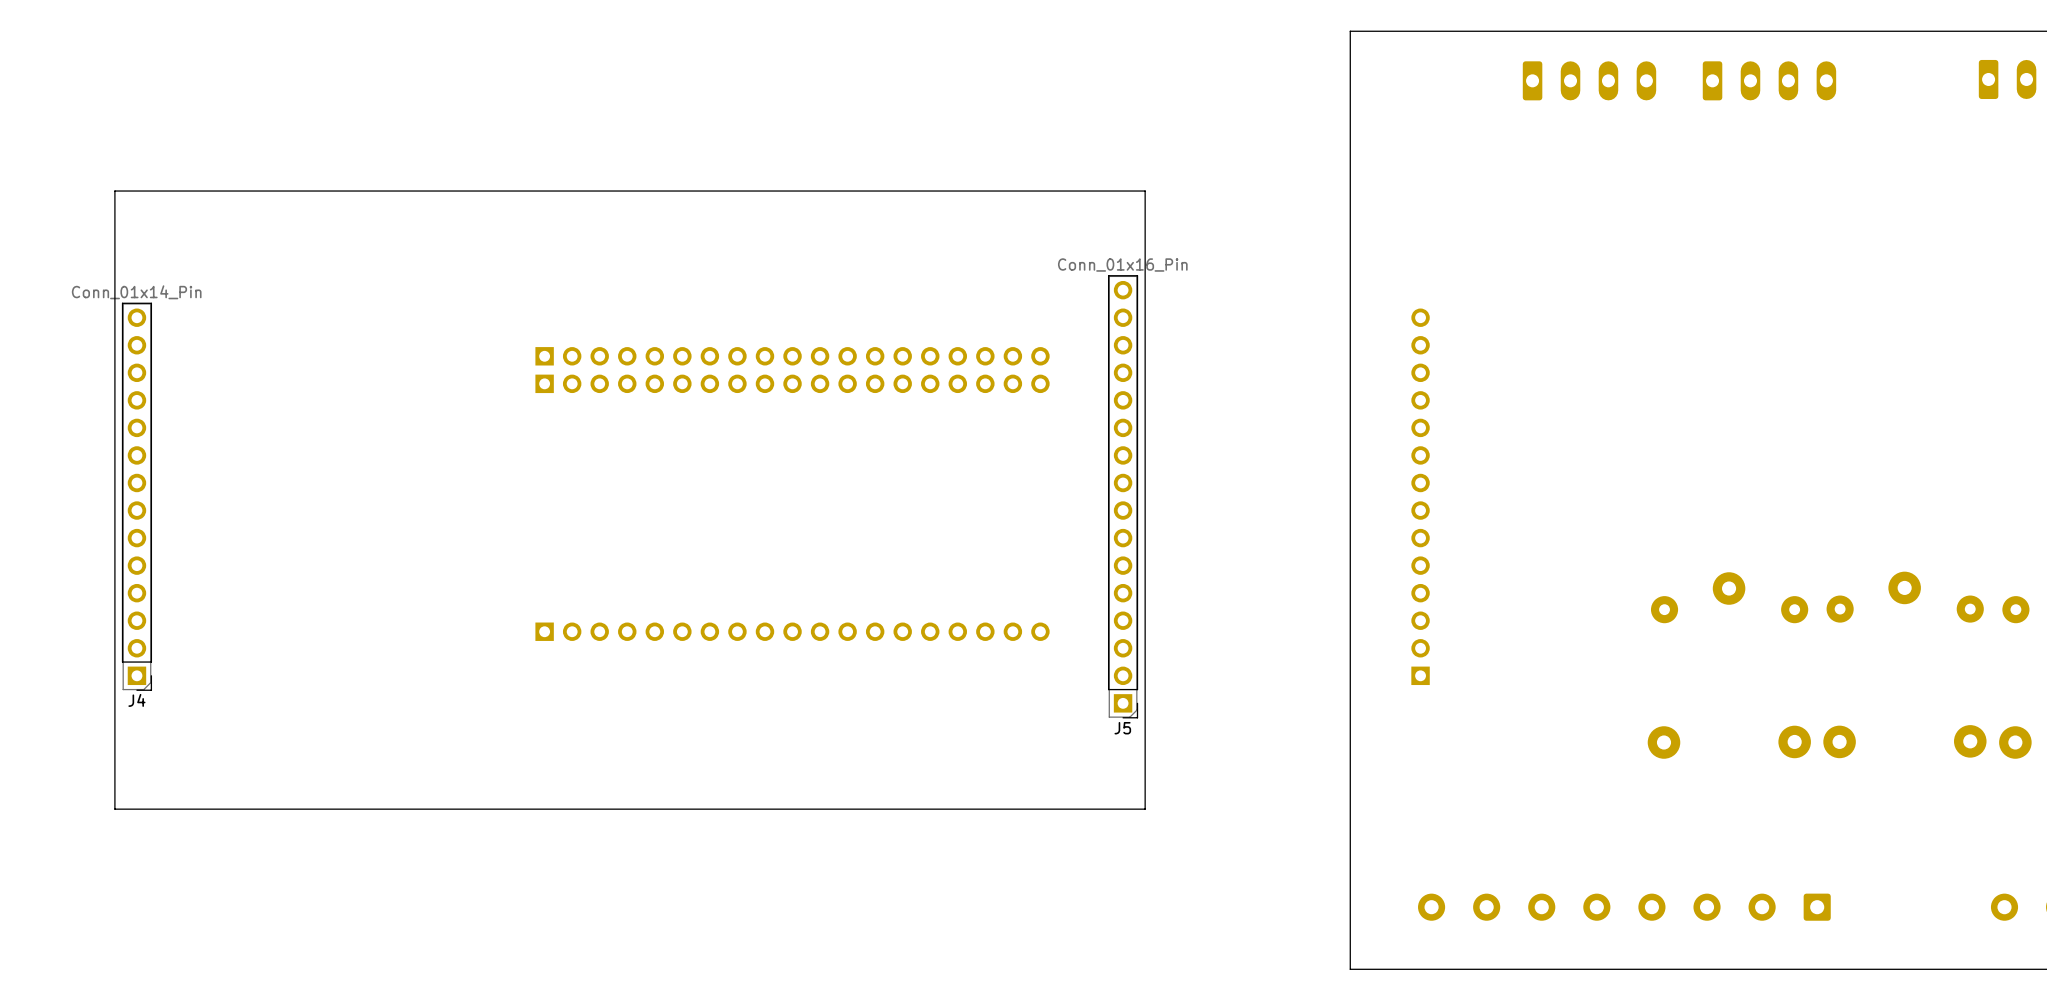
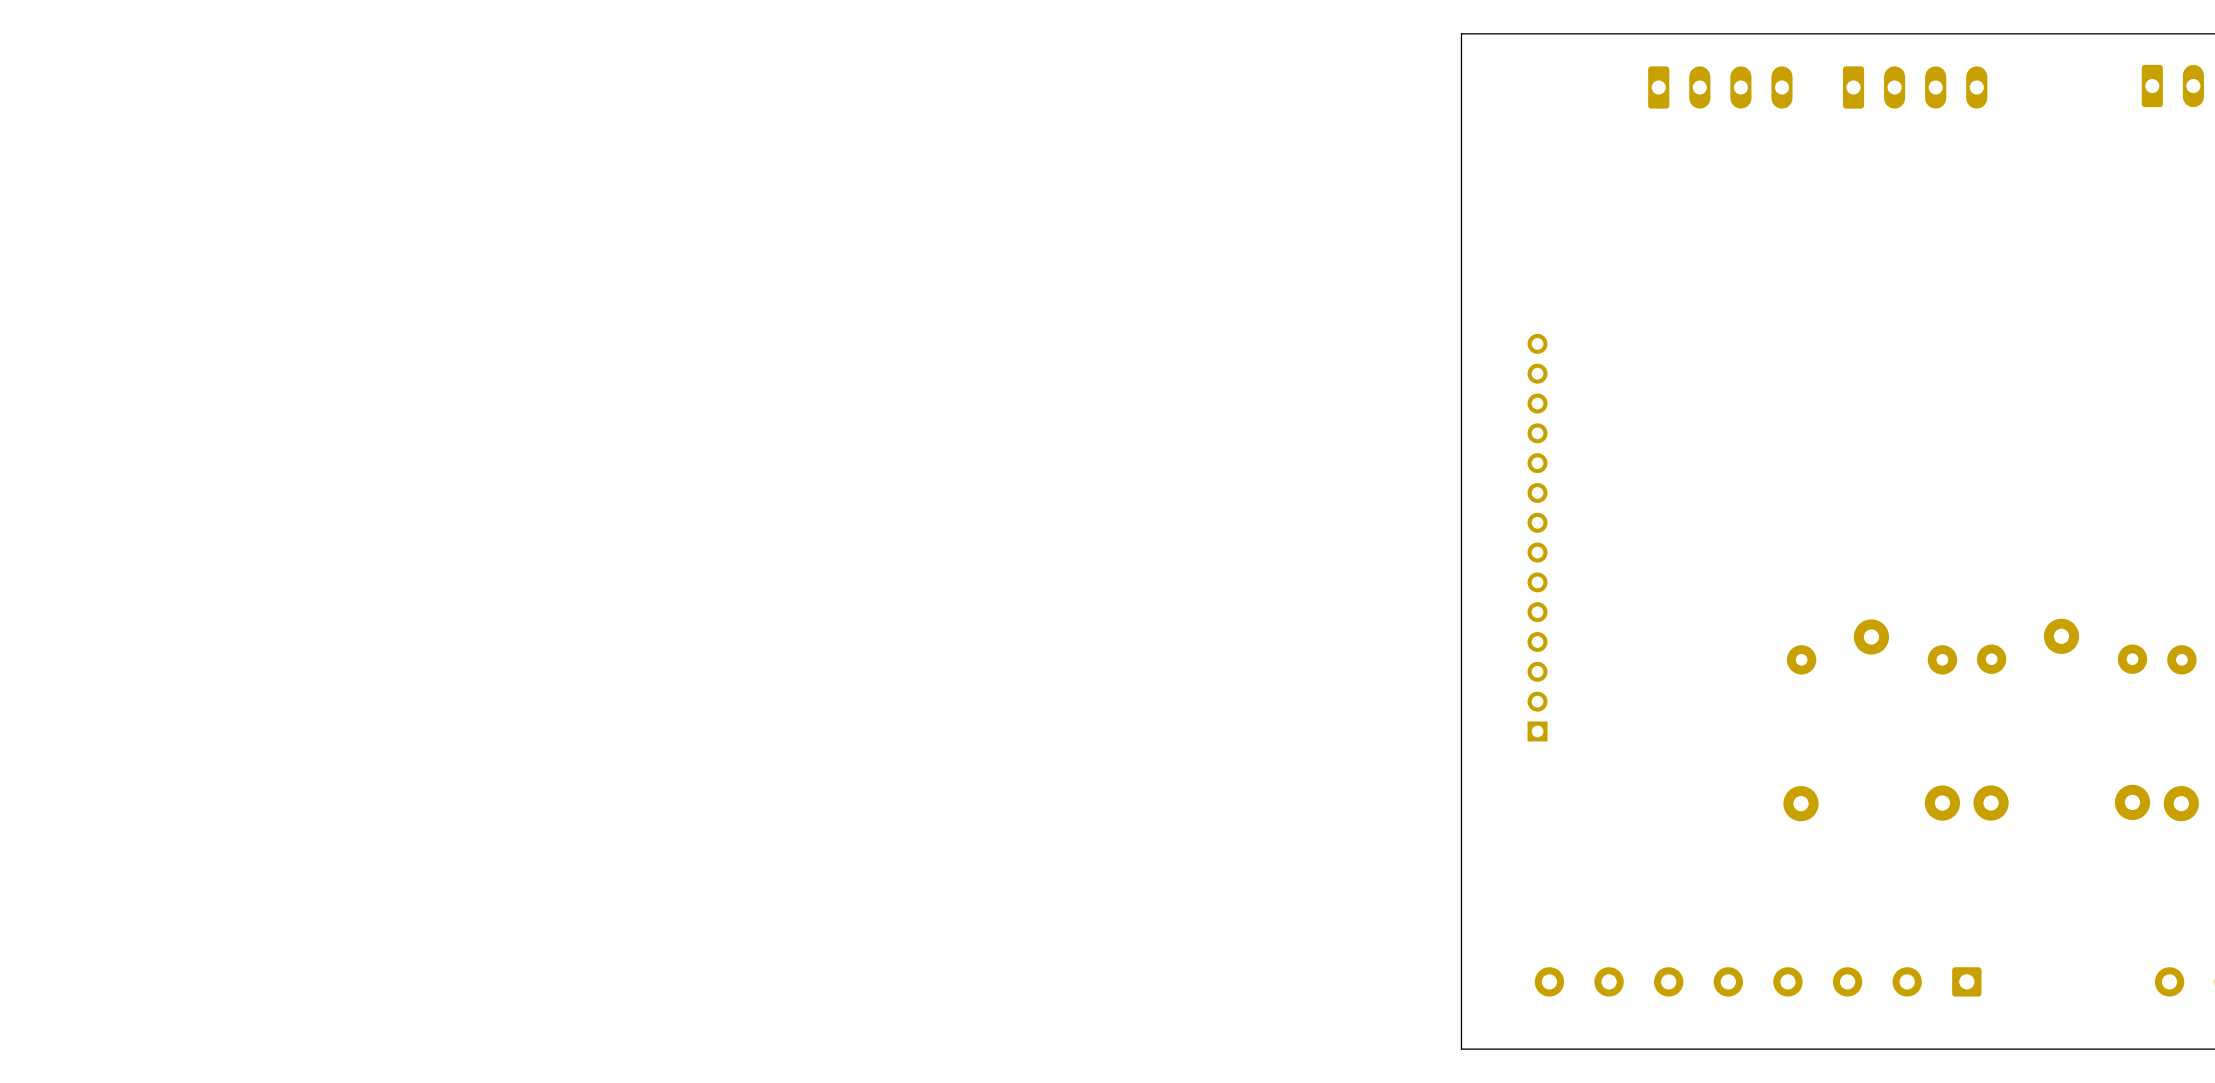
board edge: (1145, 191) (114, 191) (114, 809) (1145, 809) (1145, 191) -> none
part: (792, 356) -> none
part: (792, 383) -> none
J4: Conn_01x14_Pin (136, 496) -> none
J5: Conn_01x16_Pin (1123, 496) -> none
part: (792, 631) -> none

